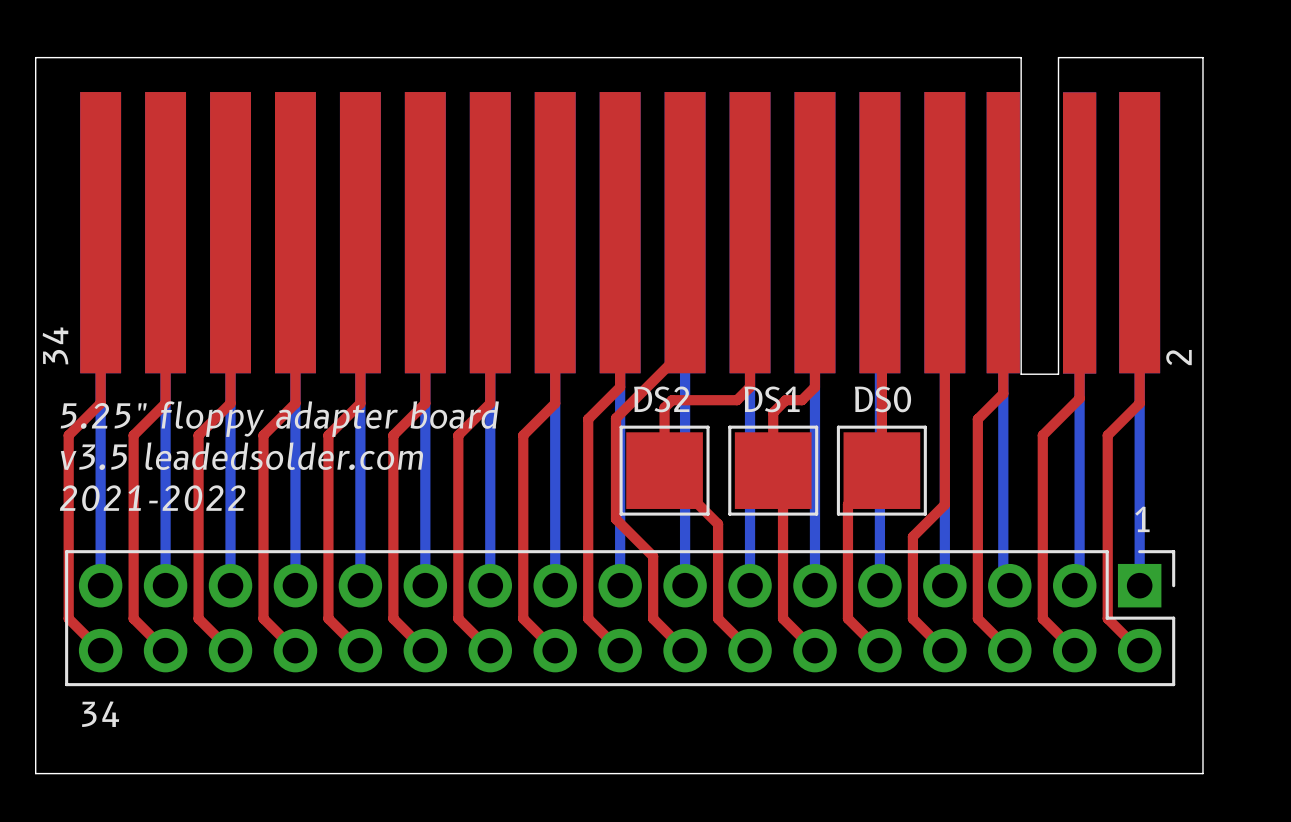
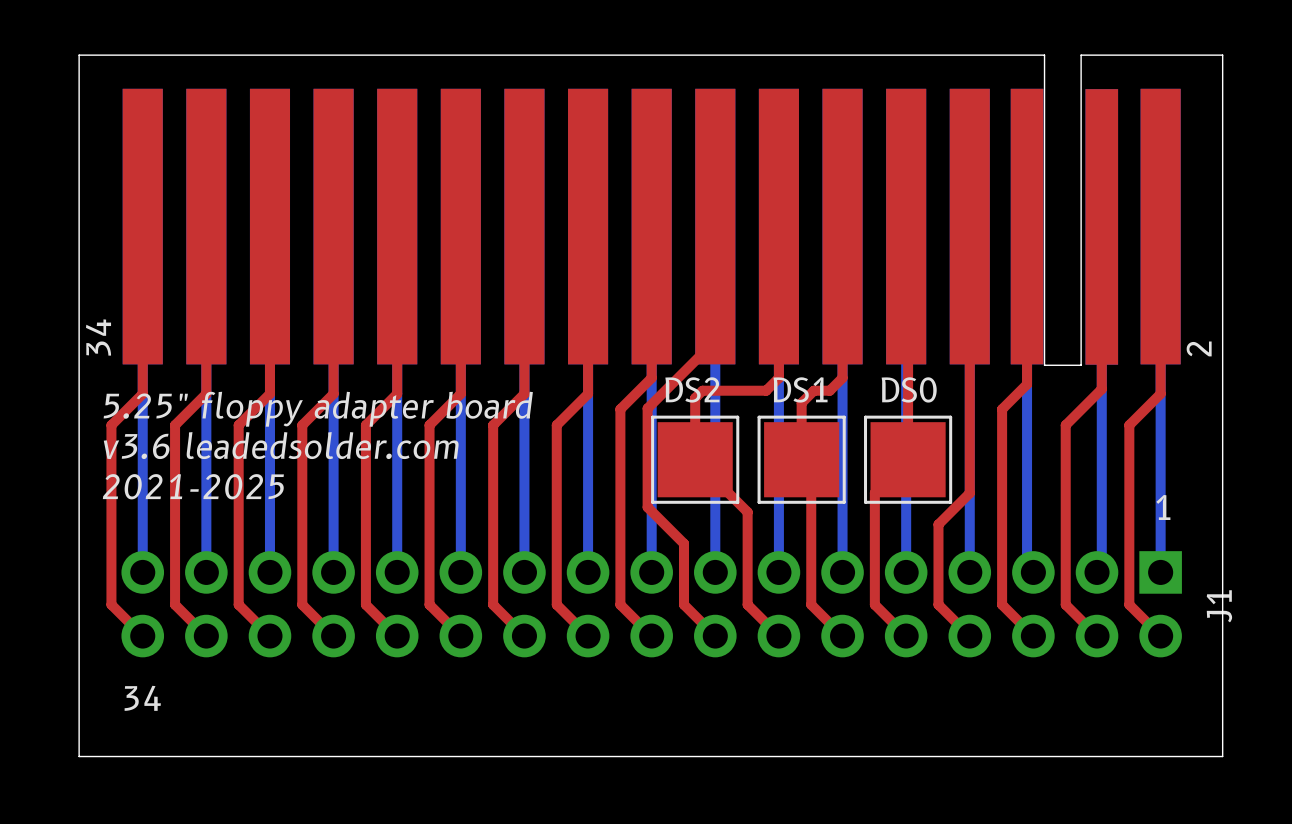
text: v3.5 leadedsolder.com (241, 456) -> v3.6 leadedsolder.com (281, 445)
text: 2021-2022 (152, 498) -> 2021-2025 (193, 486)
part: (620, 618) -> none
J1: none -> (651, 604)

